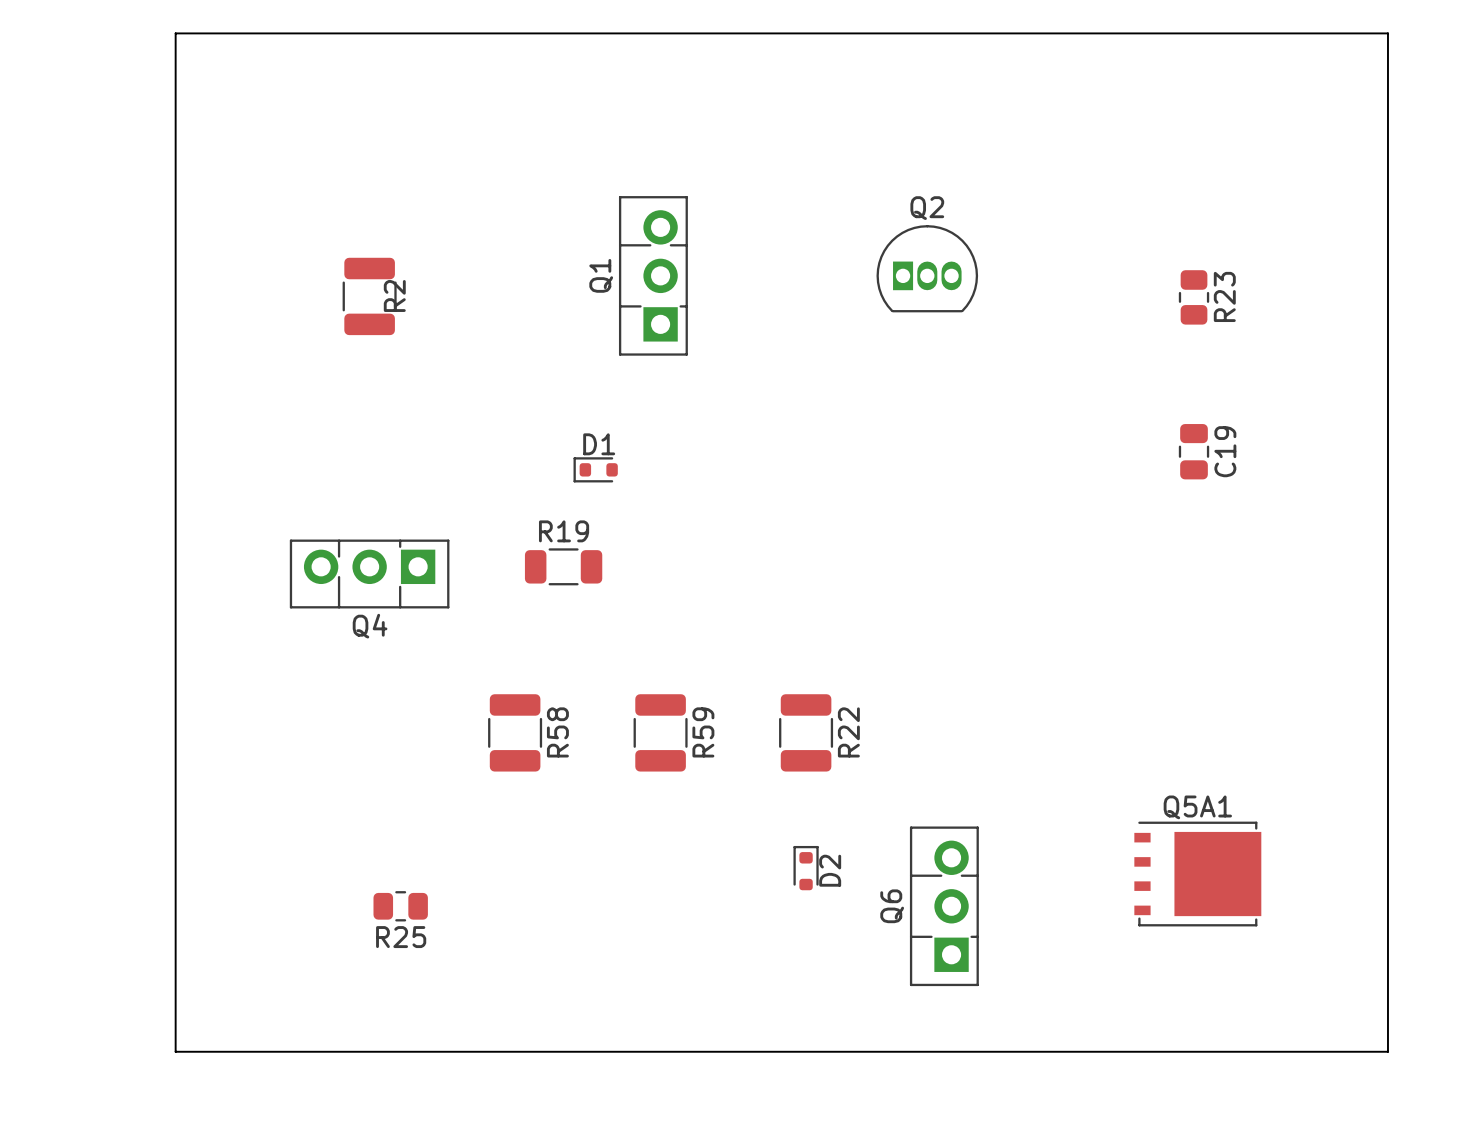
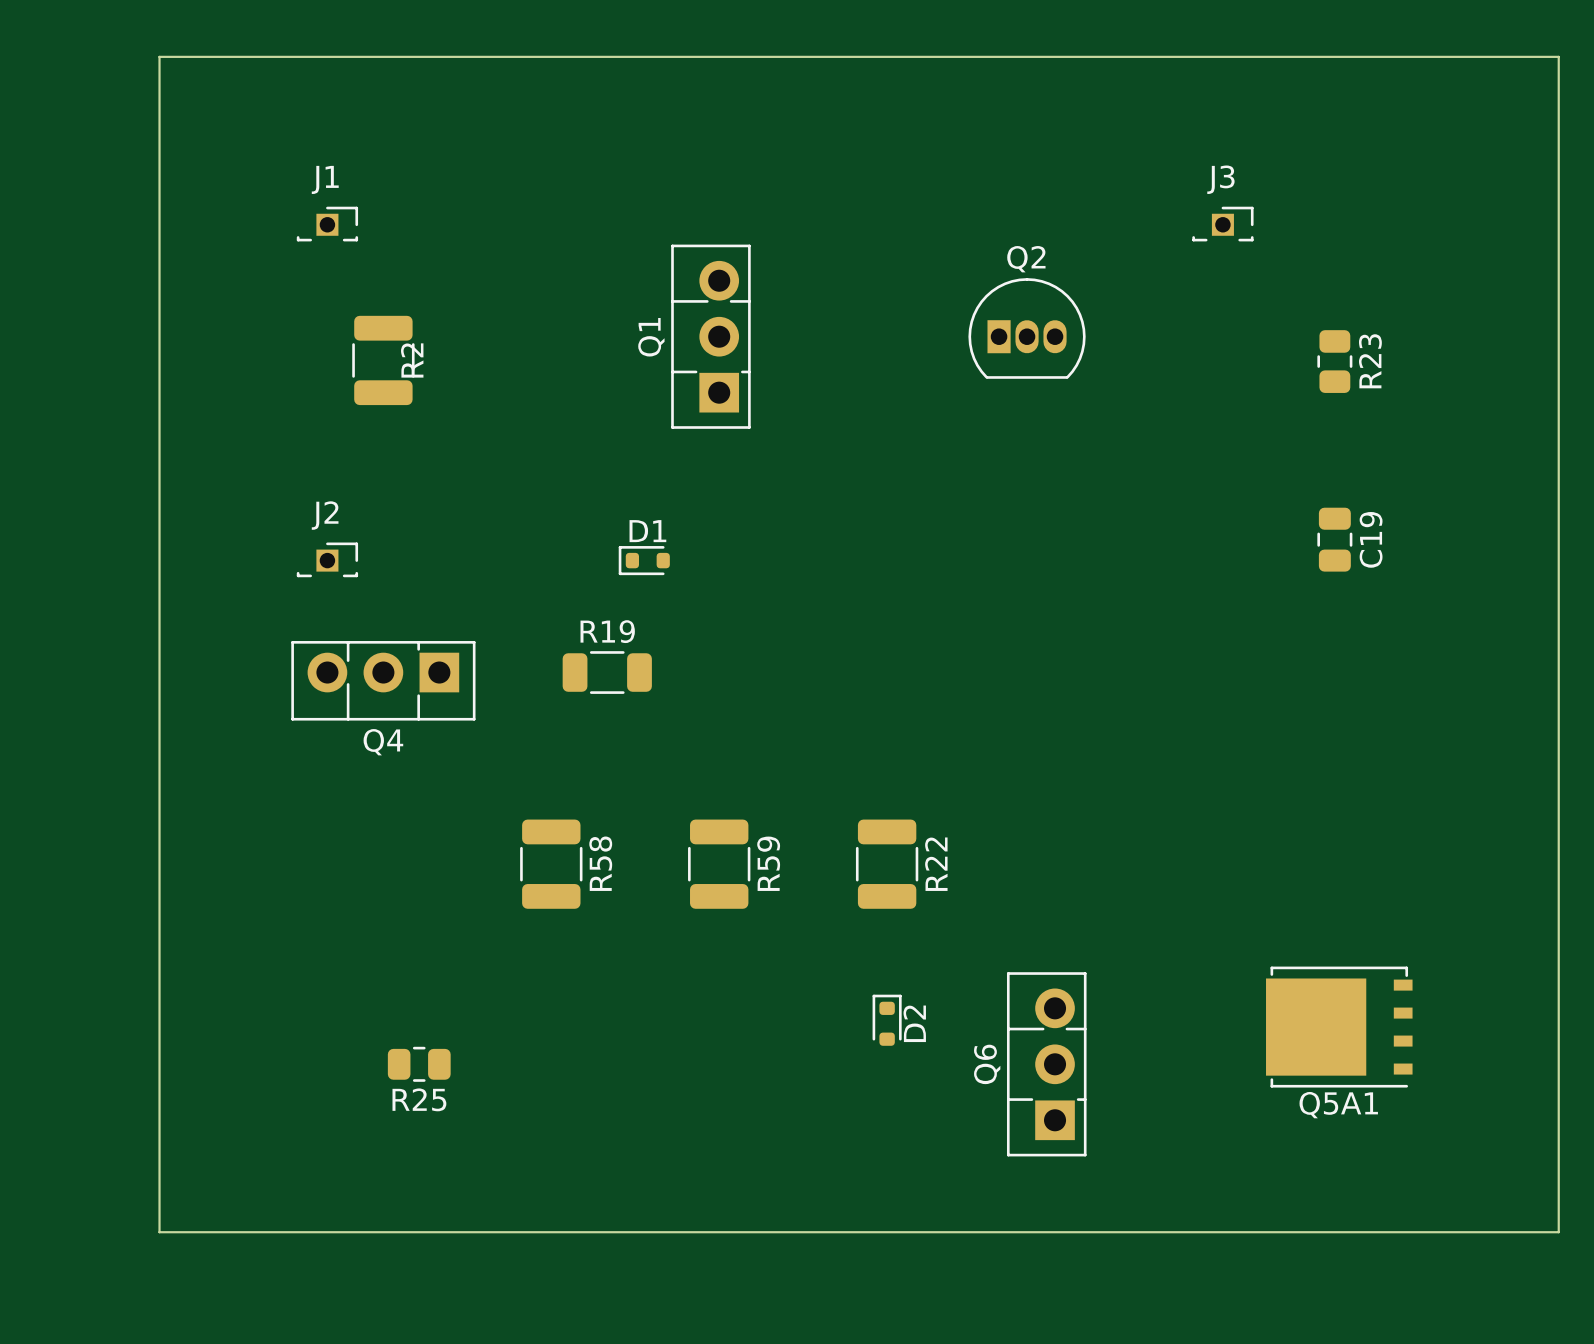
J1: none -> (327, 224)
J3: none -> (1222, 224)
J2: none -> (327, 559)
Q5A1 rotation: 0° (1197, 874) -> 180° (1339, 1027)

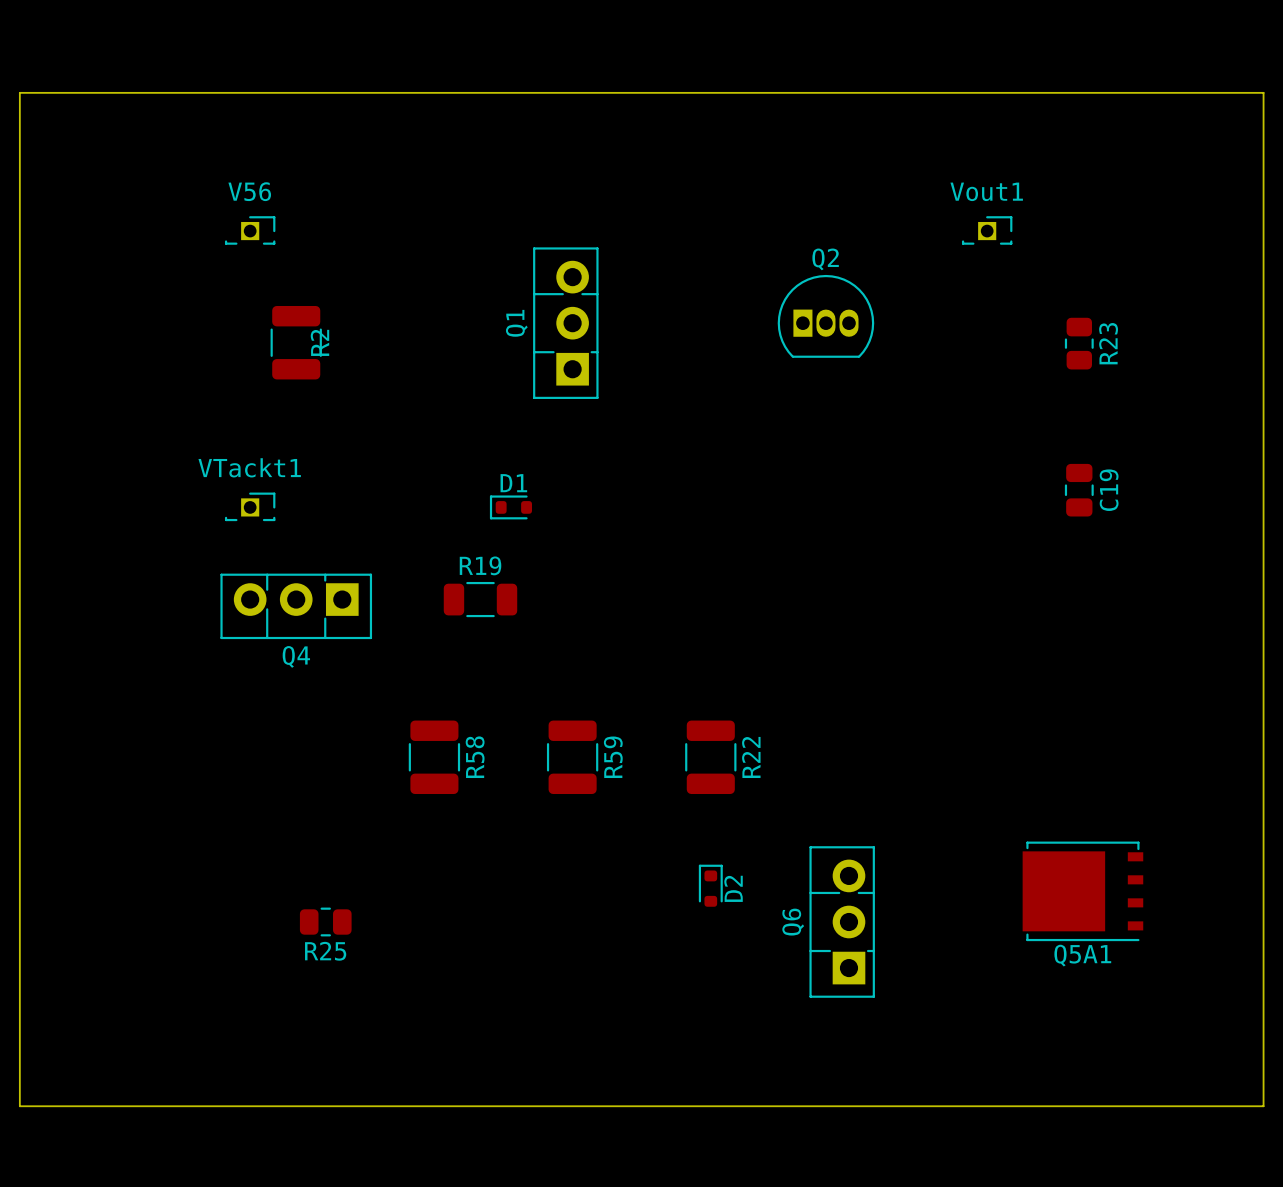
board edge: (159, 56) (159, 1232) (1558, 1232) -> (111, 92) (19, 92) (19, 1106) (1263, 1106) (1263, 1060)
J1 name: J1 (325, 179) -> V56 (249, 191)
J3 name: J3 (1220, 179) -> Vout1 (986, 191)
J2 name: J2 (325, 515) -> VTackt1 (249, 467)

